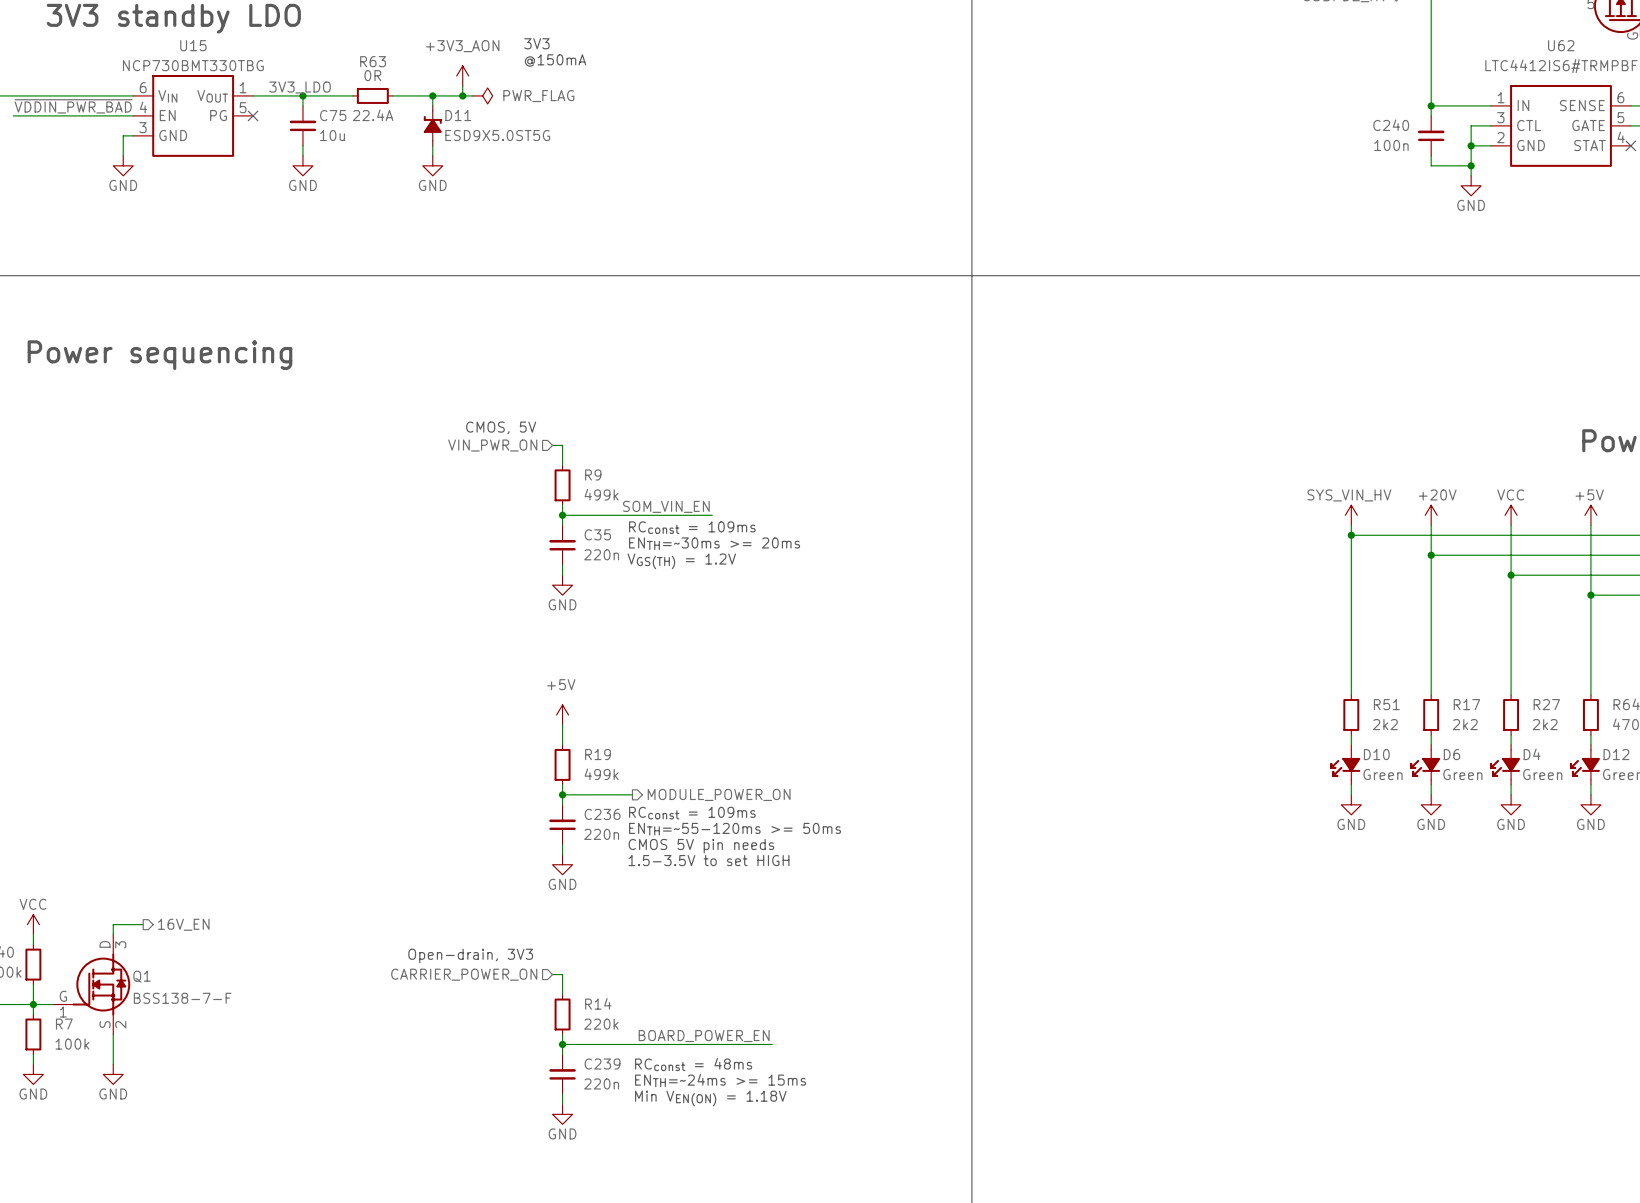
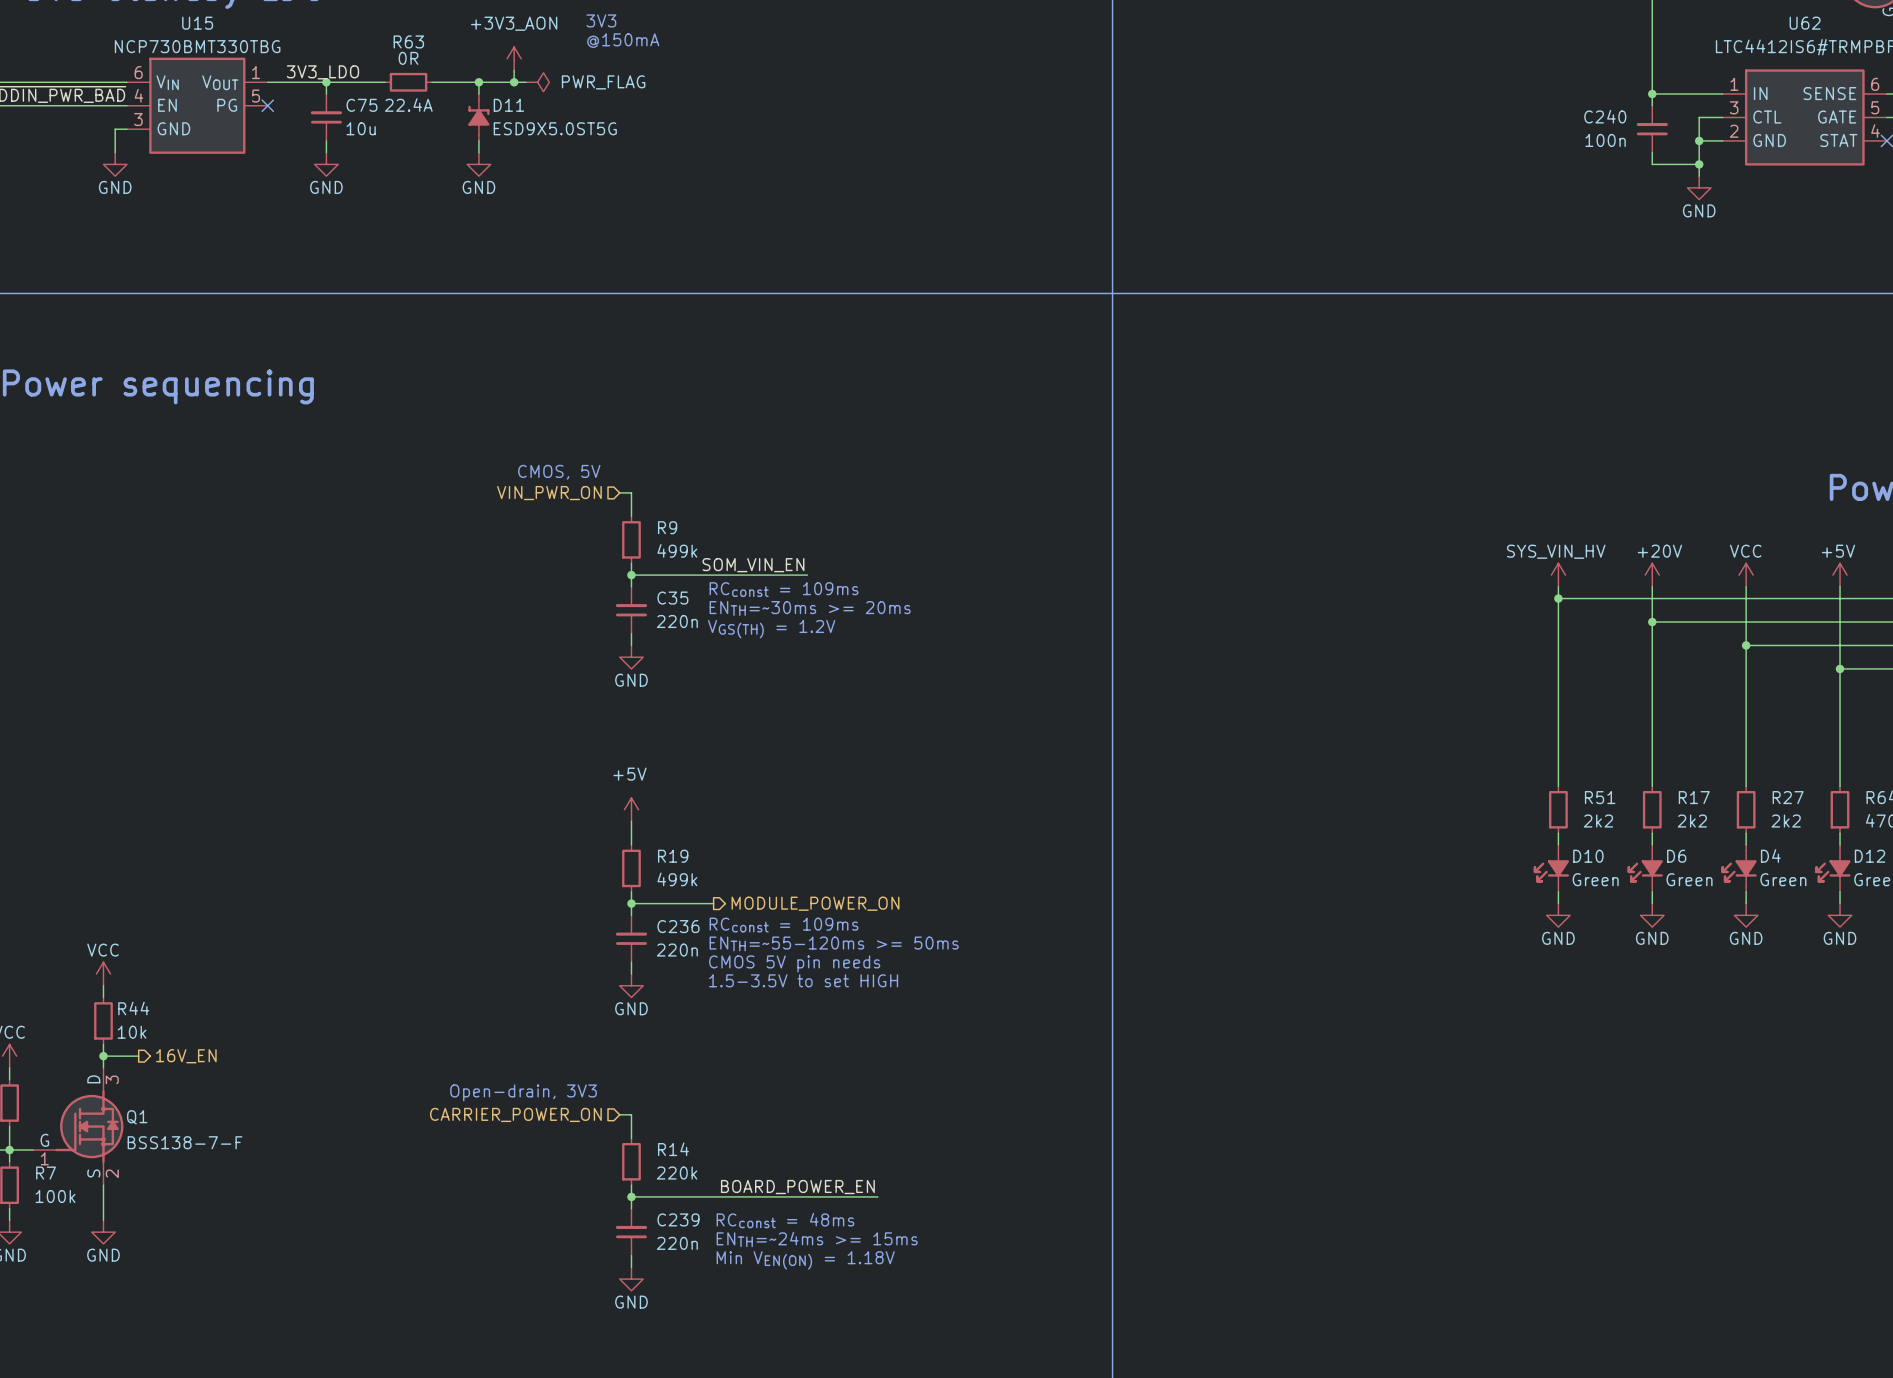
power symbol: none -> VCC (103, 974)
wire: none -> (103, 985) (103, 997)
R44: none -> (103, 1020)
wire: none -> (103, 1044) (103, 1056)
junction: none -> (103, 1056)

